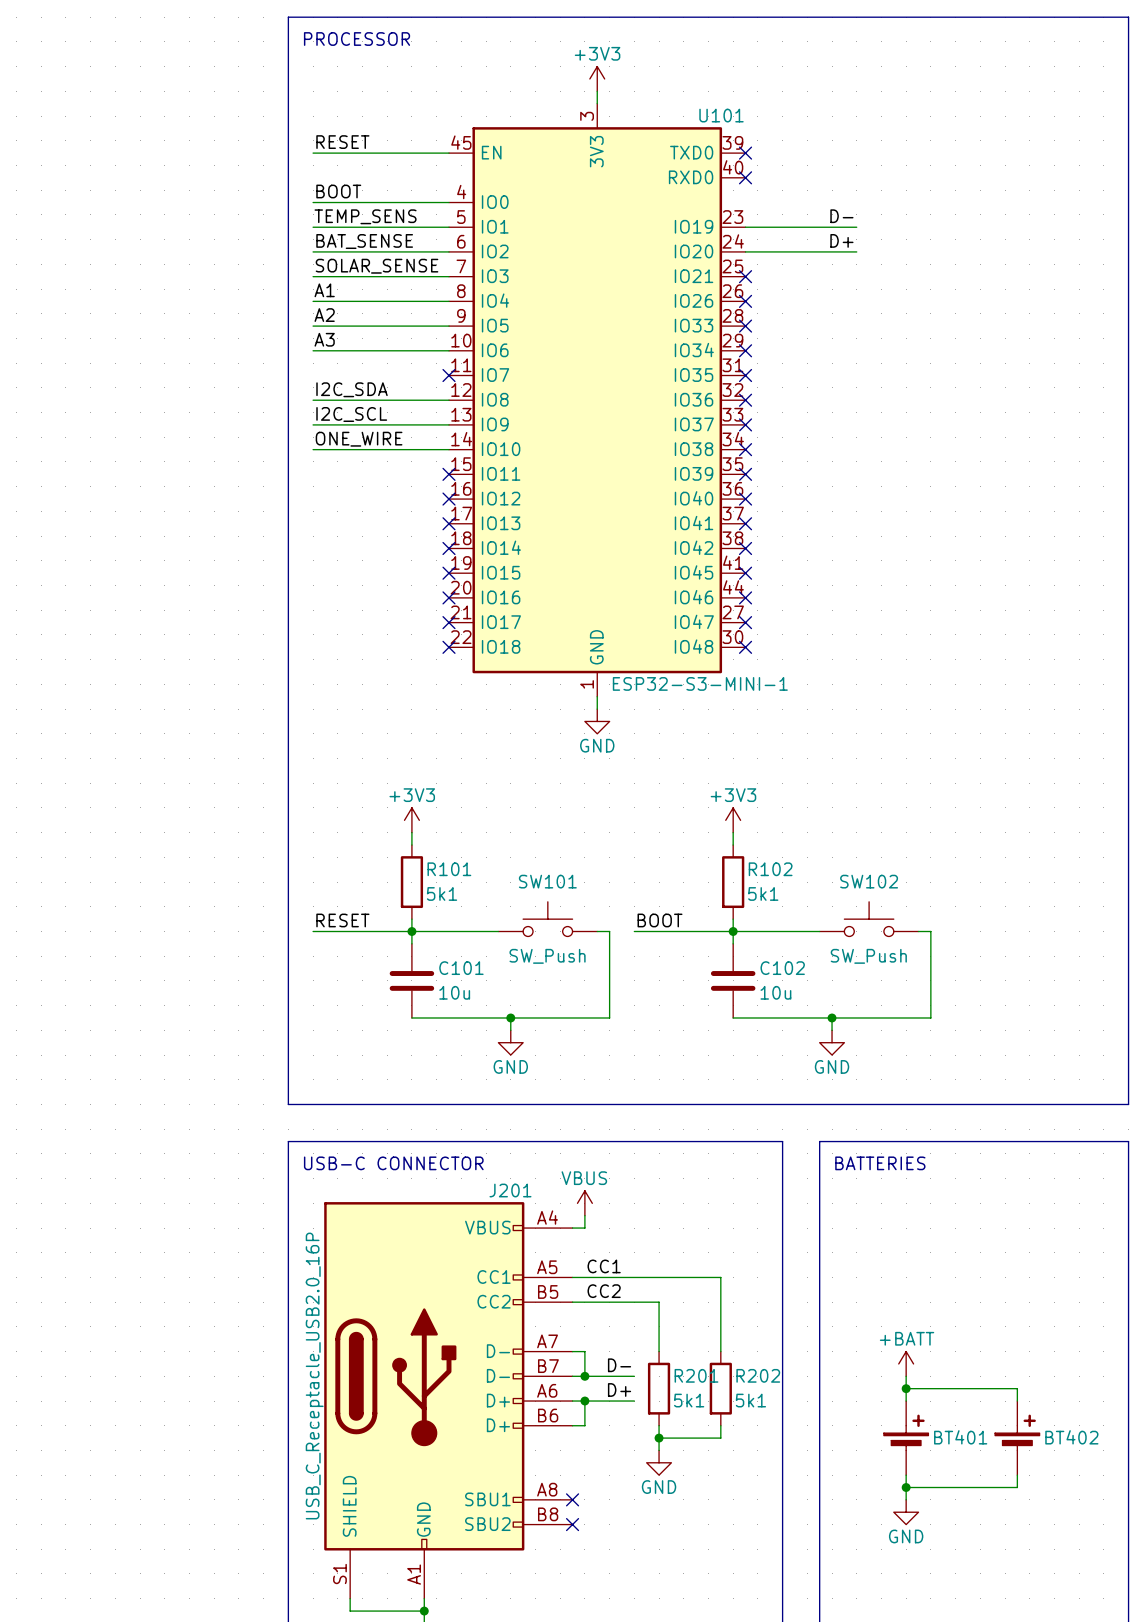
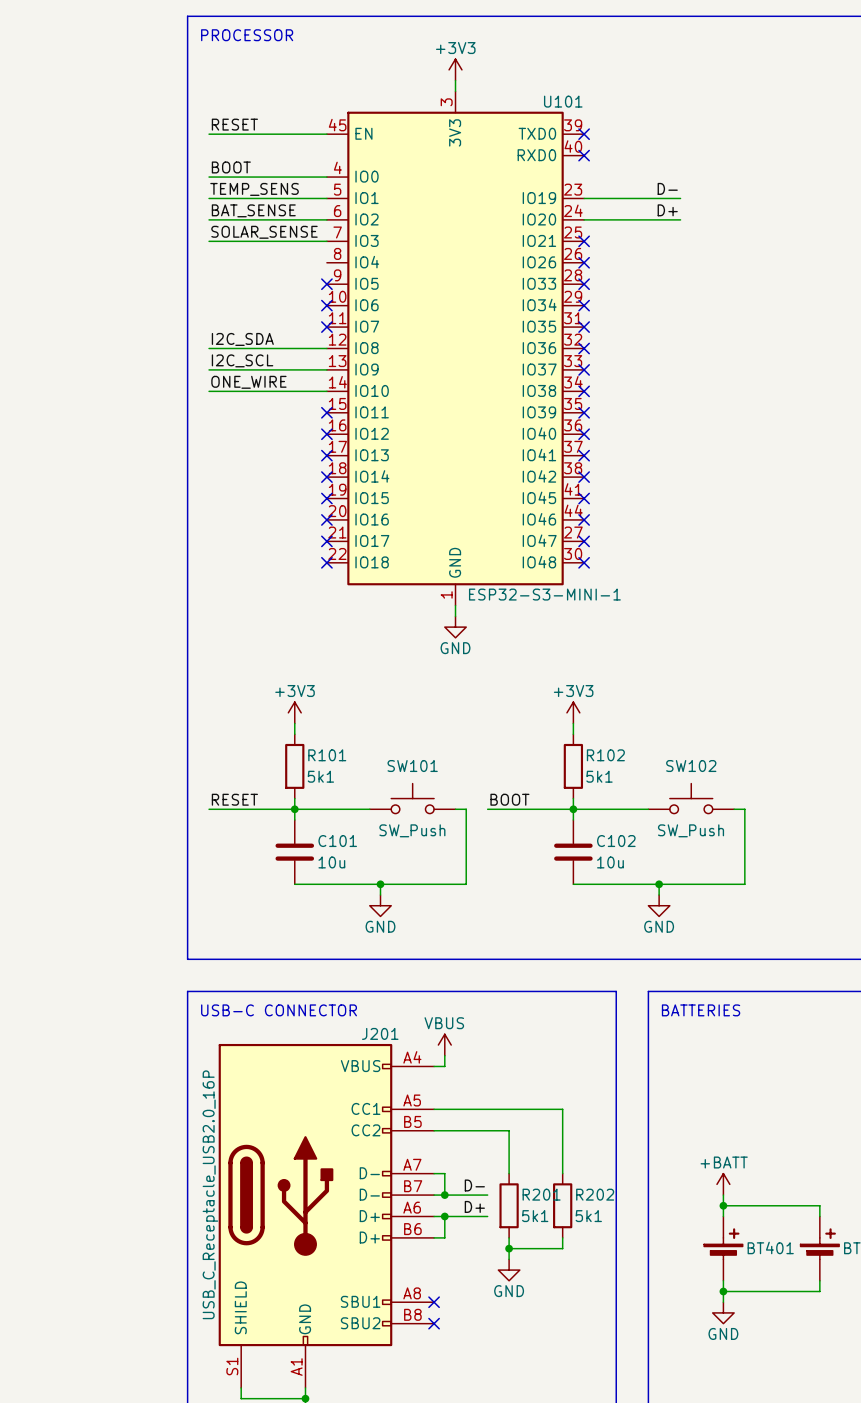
label: A1 (324, 290) -> none
wire: (313, 301) (448, 301) -> none
label: A2 (324, 315) -> none
wire: (313, 326) (448, 326) -> none
no-connect mark: none -> (326, 284)
label: A3 (324, 339) -> none
wire: (313, 350) (448, 350) -> none
no-connect mark: none -> (326, 305)
label: CC1 (604, 1266) -> none
label: CC2 (604, 1291) -> none

